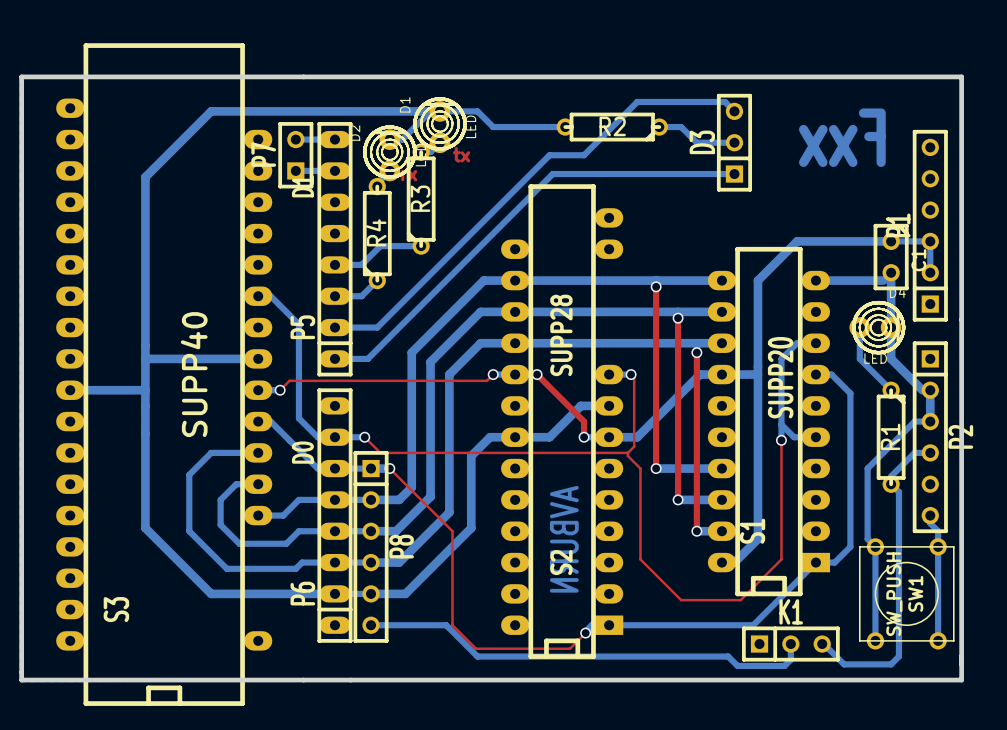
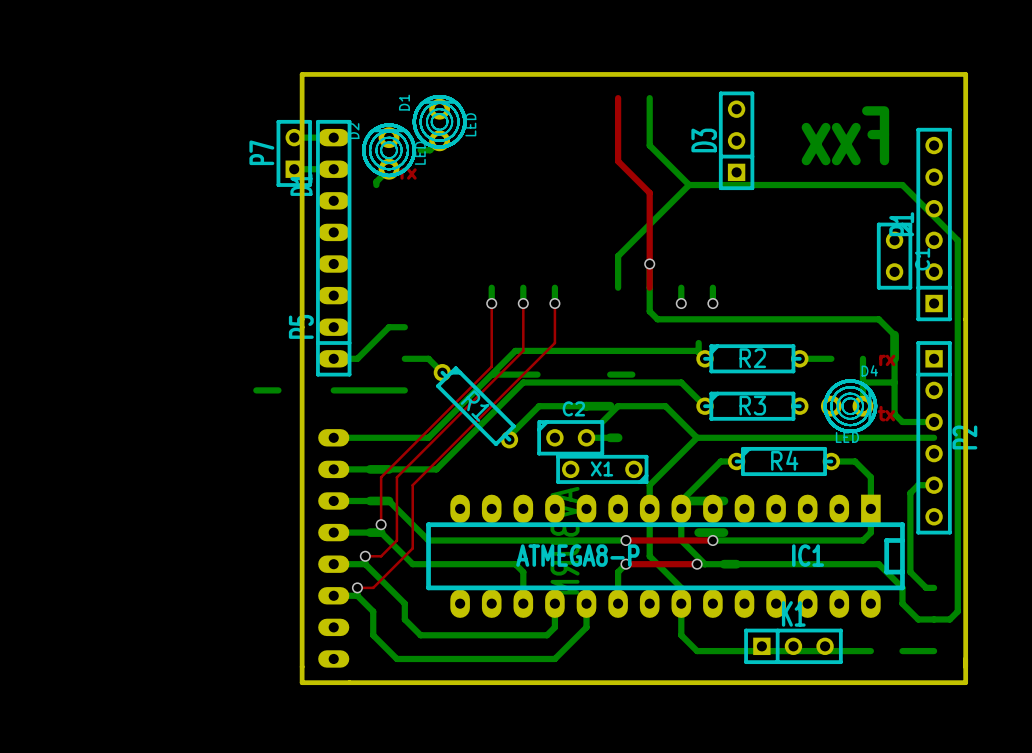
board edge: (303, 76) (21, 76) (21, 680) (303, 680) -> (302, 74) (302, 682)
top track: none -> (618, 98) (618, 161) (649, 192) (649, 287)
bottom track: none -> (649, 98) (649, 145) (689, 185)
bottom track: (439, 111) (211, 111) (145, 177) (145, 528) (211, 593) (334, 593) -> none
bottom track: (734, 111) (725, 101) (637, 101) (584, 155) (549, 155) (377, 327) (334, 327) -> none
bottom track: (565, 127) (493, 127) (477, 111) (430, 111) (402, 139) (389, 139) -> none
R2 rotation: 0° (612, 127) -> 180° (752, 358)
R2 position: (612, 127) -> (752, 358)
bottom track: (659, 127) (681, 127) (696, 142) (734, 142) -> none
text: tx (461, 154) -> none
bottom track: (734, 174) (552, 174) (367, 358) (358, 358) -> (404, 327) (389, 327) (357, 358)
bottom track: none -> (689, 185) (618, 256) (618, 287)
R3 rotation: 0° (421, 199) -> 90° clockwise (752, 406)
R3 position: (421, 199) -> (752, 406)
R4 rotation: 0° (377, 233) -> 90° clockwise (783, 461)
R4 position: (377, 233) -> (783, 461)
bottom track: (421, 246) (380, 246) (361, 264) (334, 264) -> none
via: none -> (649, 264)
bottom track: (930, 272) (930, 241) (797, 241) (757, 280) (757, 539) (734, 562) -> none
bottom track: (377, 280) (361, 296) (334, 296) -> none
bottom track: (721, 280) (483, 280) (411, 352) (411, 487) (399, 499) (389, 499) -> (626, 540) (428, 540) (389, 500)
bottom track: (815, 280) (883, 280) (891, 272) (891, 335) -> (649, 264) (649, 311) (657, 319) (878, 319) (894, 335)
top track: (656, 286) (656, 468) -> none
via: (656, 286) -> none
bottom track: none -> (491, 287) (491, 303)
bottom track: none -> (523, 287) (523, 303)
bottom track: none -> (554, 287) (554, 303)
bottom track: none -> (681, 287) (681, 303)
bottom track: none -> (712, 287) (712, 303)
bottom track: (258, 296) (270, 296) (298, 324) (298, 418) (317, 437) (334, 437) -> none
top track: none -> (491, 303) (491, 366) (381, 477) (381, 524)
via: none -> (491, 303)
top track: none -> (523, 303) (523, 350) (396, 477) (396, 540) (381, 556) (365, 556)
via: none -> (523, 303)
top track: none -> (554, 303) (554, 343) (412, 485) (412, 548) (373, 587) (357, 587)
via: none -> (554, 303)
via: none -> (712, 303)
bottom track: (721, 311) (480, 311) (430, 362) (430, 496) (396, 531) (381, 531) -> none
top track: (678, 318) (678, 499) -> none
via position: (678, 318) -> (681, 303)
bottom track: (859, 327) (859, 358) (891, 390) -> none
D4 position: (877, 327) -> (849, 406)
bottom track: (721, 343) (480, 343) (449, 374) (449, 512) (399, 562) (366, 562) -> none
bottom track: (815, 343) (797, 343) (781, 358) (781, 440) -> none
top track: (696, 352) (696, 531) -> none
via: (696, 352) -> none
bottom track: (145, 358) (258, 358) -> none
bottom track: none -> (404, 358) (428, 358) (442, 372)
bottom track: none -> (705, 358) (697, 350) (515, 350) (428, 437) (363, 437)
bottom track: none -> (799, 358) (831, 358)
bottom track: none -> (862, 358) (862, 406)
bottom track: (891, 358) (922, 390) (930, 390) (930, 421) -> (894, 358) (894, 414) (902, 422) (918, 422)
text: none -> rx (887, 360)
bottom track: (757, 366) (757, 374) (700, 374) (637, 437) (616, 437) -> none
S3: SUPP40 (164, 374) -> none
top track: (493, 374) (486, 380) (289, 380) (280, 390) -> none
via: (493, 374) -> none
top track: (537, 374) (584, 421) (584, 437) -> none
via: (537, 374) -> none
top track: (631, 374) (634, 377) (634, 446) (627, 452) -> none
via: (631, 374) -> none
bottom track: (815, 374) (831, 374) (850, 393) (850, 546) (834, 562) -> none
bottom track: none -> (862, 382) (894, 382)
bottom track: (70, 390) (145, 390) -> none
via: (280, 390) -> none
bottom track: none -> (333, 390) (404, 390)
bottom track: (580, 405) (549, 437) (490, 437) (471, 456) (471, 528) (405, 593) (358, 593) -> (581, 406) (539, 406) (509, 435) (509, 439)
bottom track: none -> (705, 406) (681, 382) (523, 382) (436, 469) (389, 469)
text: none -> tx (886, 413)
bottom track: (258, 421) (270, 421) (317, 468) (334, 468) -> none
S2: SUPP28 (562, 421) -> none
bottom track: none -> (602, 422) (618, 406) (665, 406) (697, 437)
S1: SUPP20 (768, 421) -> none
bottom track: (914, 421) (867, 468) (867, 476) -> (831, 461) (855, 461) (870, 477)
bottom track: (781, 424) (794, 437) -> (697, 437) (796, 437)
top track: (364, 437) (380, 452) (627, 452) -> none
via: (364, 437) -> none
C2: none -> (570, 437)
via: (584, 437) -> none
bottom track: none -> (697, 437) (649, 485) (649, 556) (681, 587) (681, 635) (697, 651) (870, 651)
bottom track: none -> (818, 437) (934, 437)
R1 rotation: 0° (891, 437) -> 45° counterclockwise (475, 406)
R1 position: (891, 437) -> (475, 406)
top track: (781, 440) (781, 559) (740, 600) (681, 600) (640, 559) (640, 468) (627, 456) (627, 452) -> none
via: (781, 440) -> none
bottom track: (258, 452) (211, 452) (189, 474) (189, 531) (226, 568) (295, 568) (302, 562) (334, 562) -> none
bottom track: (930, 452) (914, 452) (891, 476) (891, 484) (898, 492) (898, 586) -> (837, 564) (878, 564) (902, 587)
bottom track: none -> (736, 461) (720, 461) (681, 500) (681, 540) (705, 564)
top track: (389, 468) (452, 531) (452, 625) (475, 648) (569, 648) (585, 633) -> none
via: (389, 468) -> none
X1: none -> (602, 469)
bottom track: (656, 468) (721, 468) -> none
via: (656, 468) -> none
bottom track: (258, 484) (236, 484) (220, 499) (220, 524) (239, 543) (286, 543) (298, 531) (334, 531) -> none
bottom track: none -> (934, 485) (918, 485) (910, 493) (910, 572) (926, 587) (934, 587)
bottom track: (334, 499) (298, 499) (283, 515) (258, 515) -> none
via: (678, 499) -> none
P6 side: top (334, 515) -> bottom (333, 548)
bottom track: (930, 515) (930, 523) (938, 531) (938, 640) -> none
bottom track: none -> (381, 524) (381, 532) (412, 564) (515, 564) (523, 572) (523, 603)
via: none -> (381, 524)
via: (696, 531) -> none
bottom track: (867, 531) (867, 539) (875, 546) (875, 640) -> (870, 532) (862, 540) (712, 540)
top track: none -> (626, 540) (712, 540)
via: none -> (626, 540)
via: none -> (712, 540)
P8: (371, 546) -> none
bottom track: none -> (365, 556) (365, 564) (404, 603) (404, 619) (420, 635) (547, 635) (554, 627) (554, 603)
via: none -> (365, 556)
IC1: none -> ATMEGA8-P (665, 556)
bottom track: none -> (626, 564) (618, 572) (618, 603)
top track: none -> (626, 564) (697, 564)
via: none -> (626, 564)
bottom track: none -> (697, 564) (723, 564)
via: none -> (697, 564)
bottom track: (815, 562) (753, 625) (593, 625) (585, 633) -> (818, 564) (736, 564)
via: none -> (357, 587)
SW1: SW_PUSH (906, 593) -> none
bottom track: (898, 601) (898, 656) (891, 664) (844, 664) (822, 644) -> (902, 603) (918, 619) (949, 619) (957, 611) (957, 240) (902, 185) (689, 185)
bottom track: (371, 625) (446, 625) (477, 656) -> (357, 587) (357, 595) (373, 611) (373, 635) (396, 658) (477, 658)
via: (585, 633) -> none
bottom track: (790, 644) (790, 659) (784, 665) (737, 665) (728, 656) (554, 656) -> (586, 603) (586, 627) (554, 658)
bottom track: none -> (902, 651) (934, 651)

